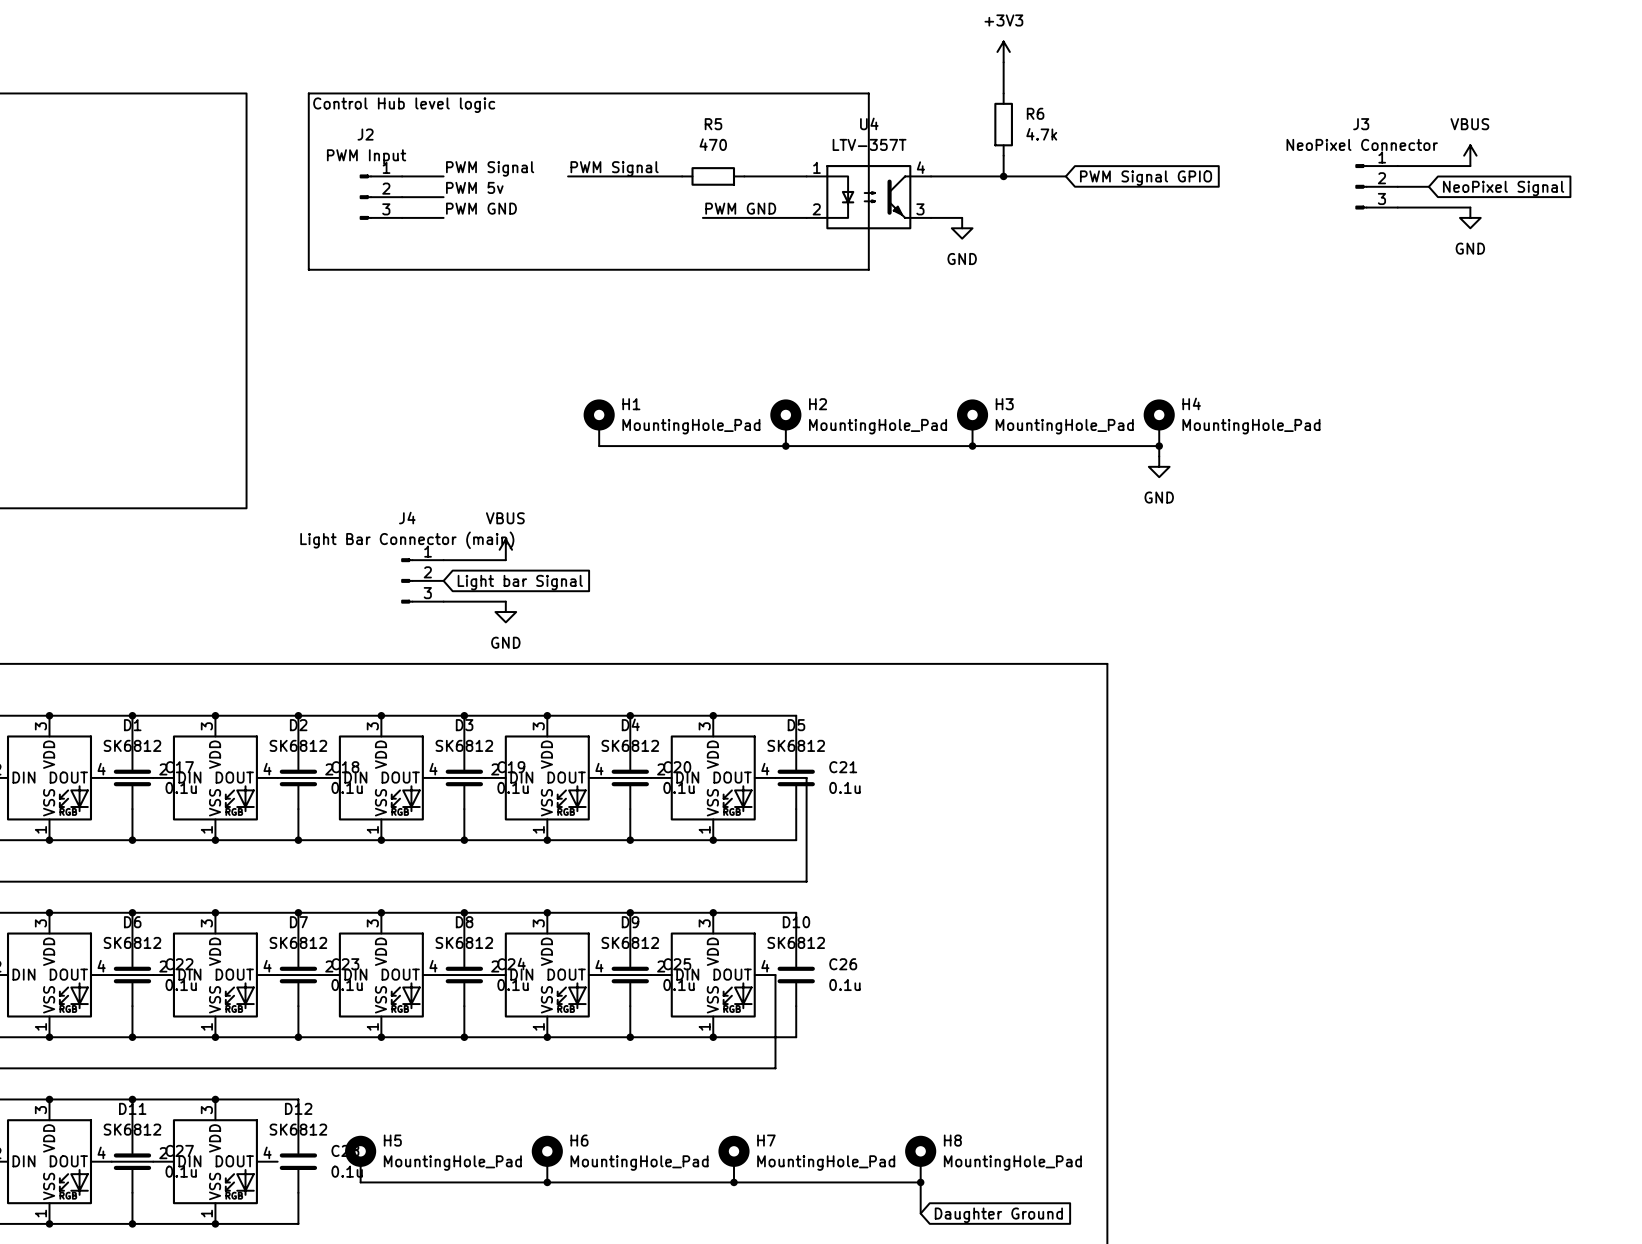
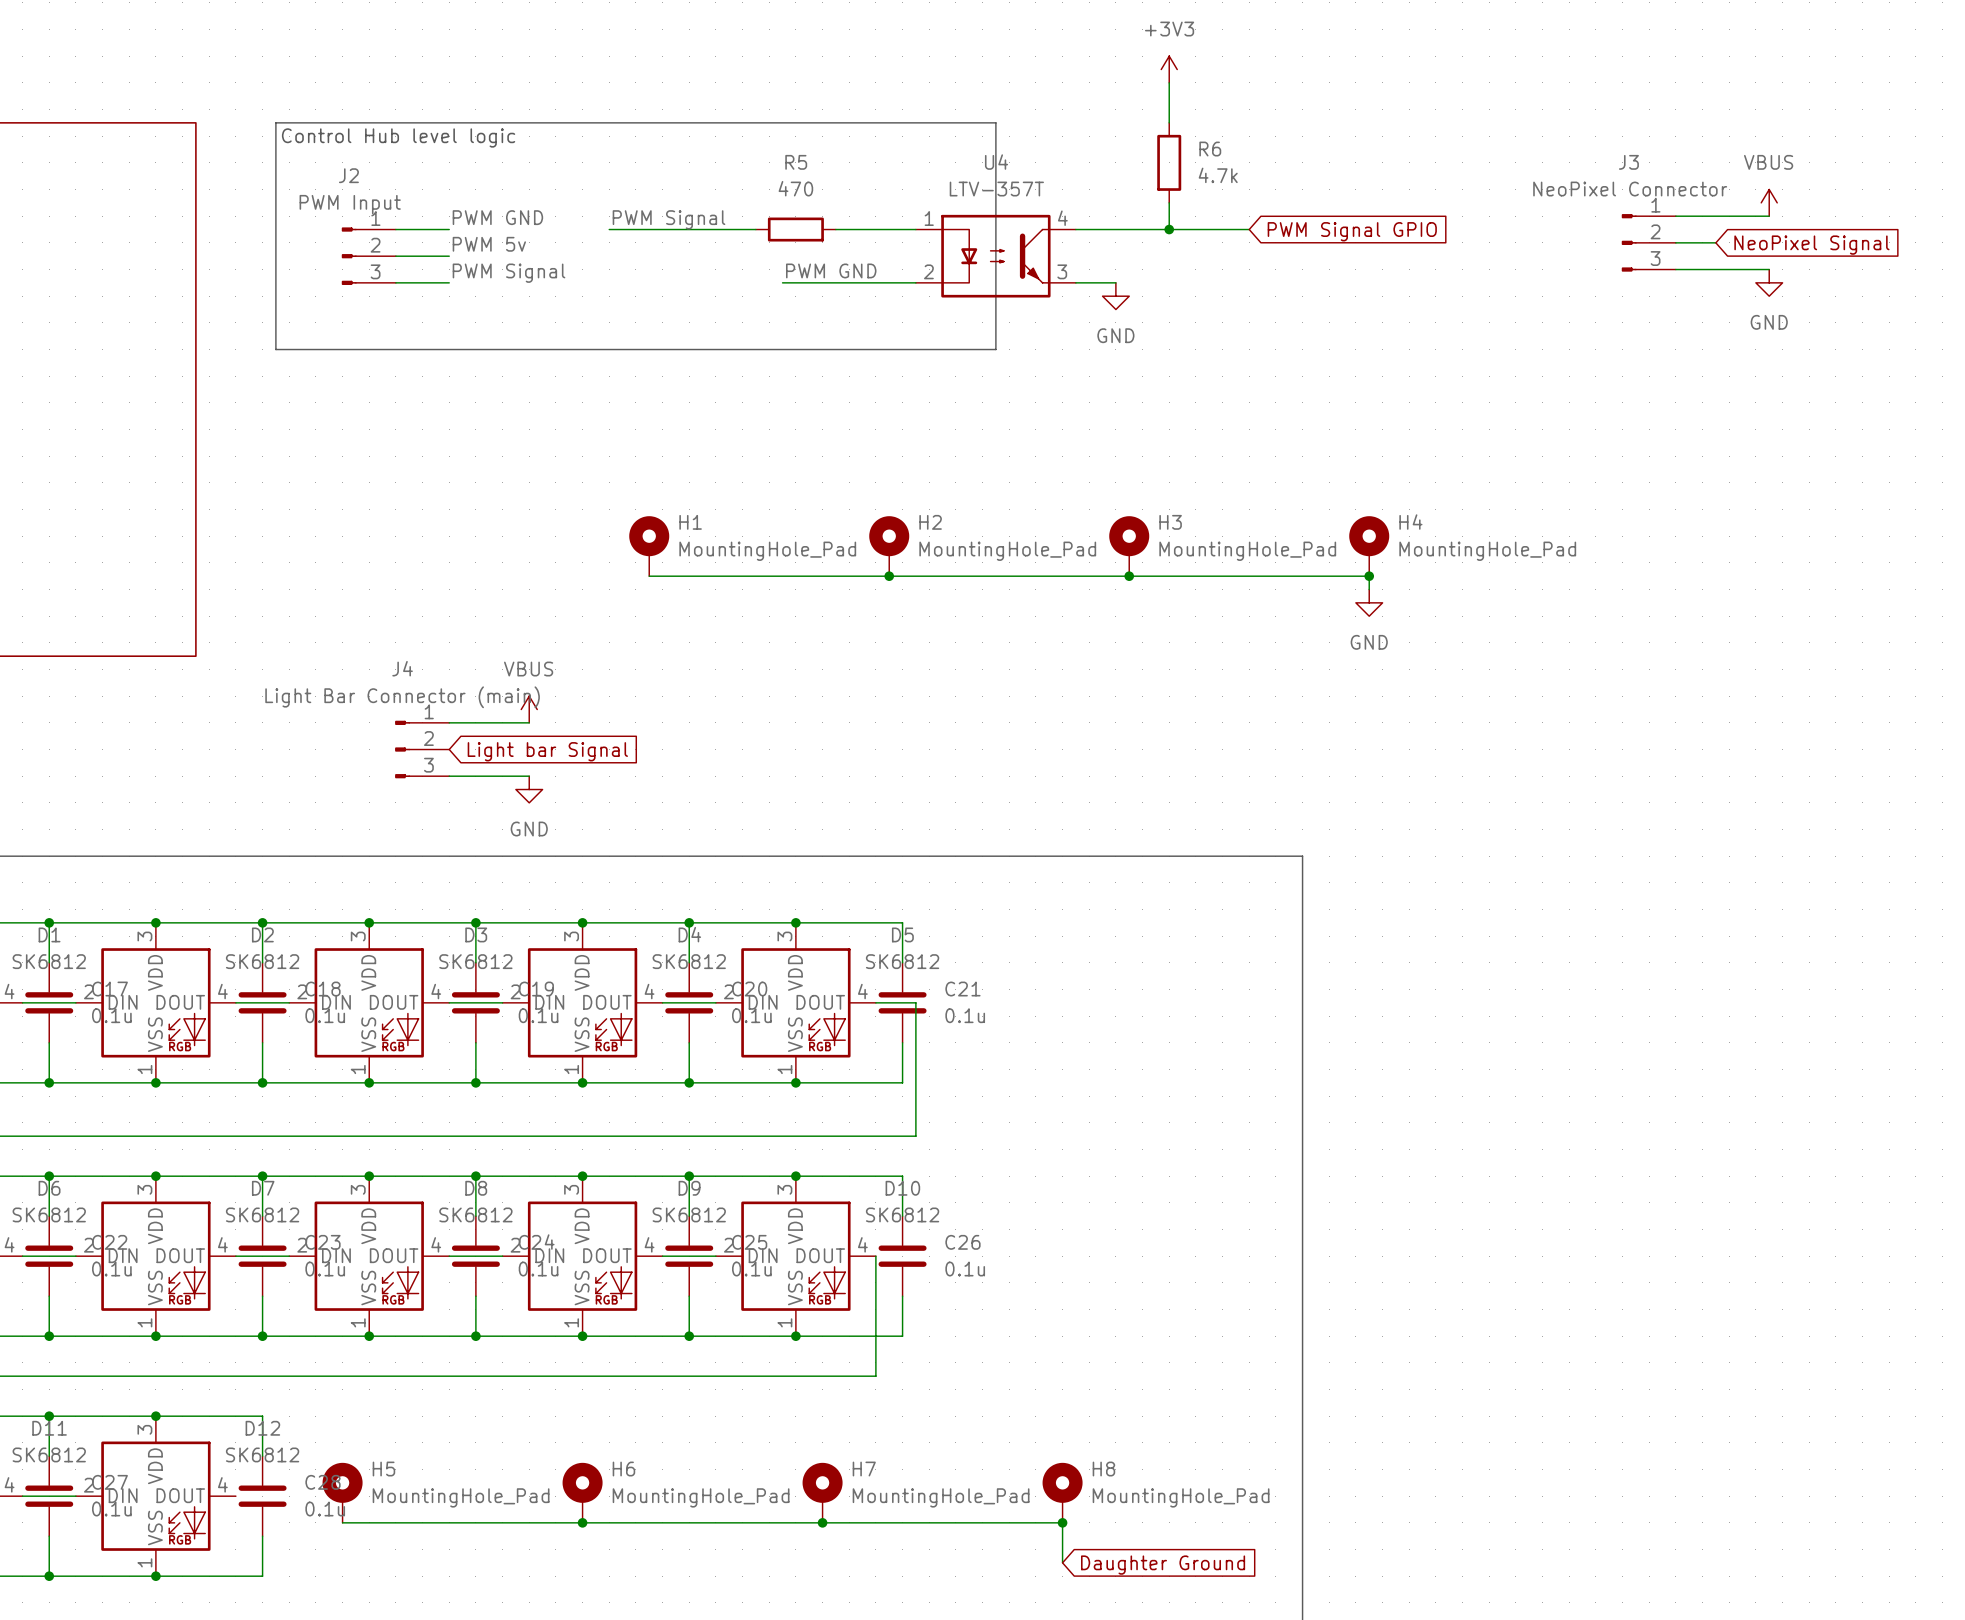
label: PWM Signal (490, 168) -> PWM GND (497, 217)
label: PWM GND (481, 208) -> PWM Signal (509, 273)

